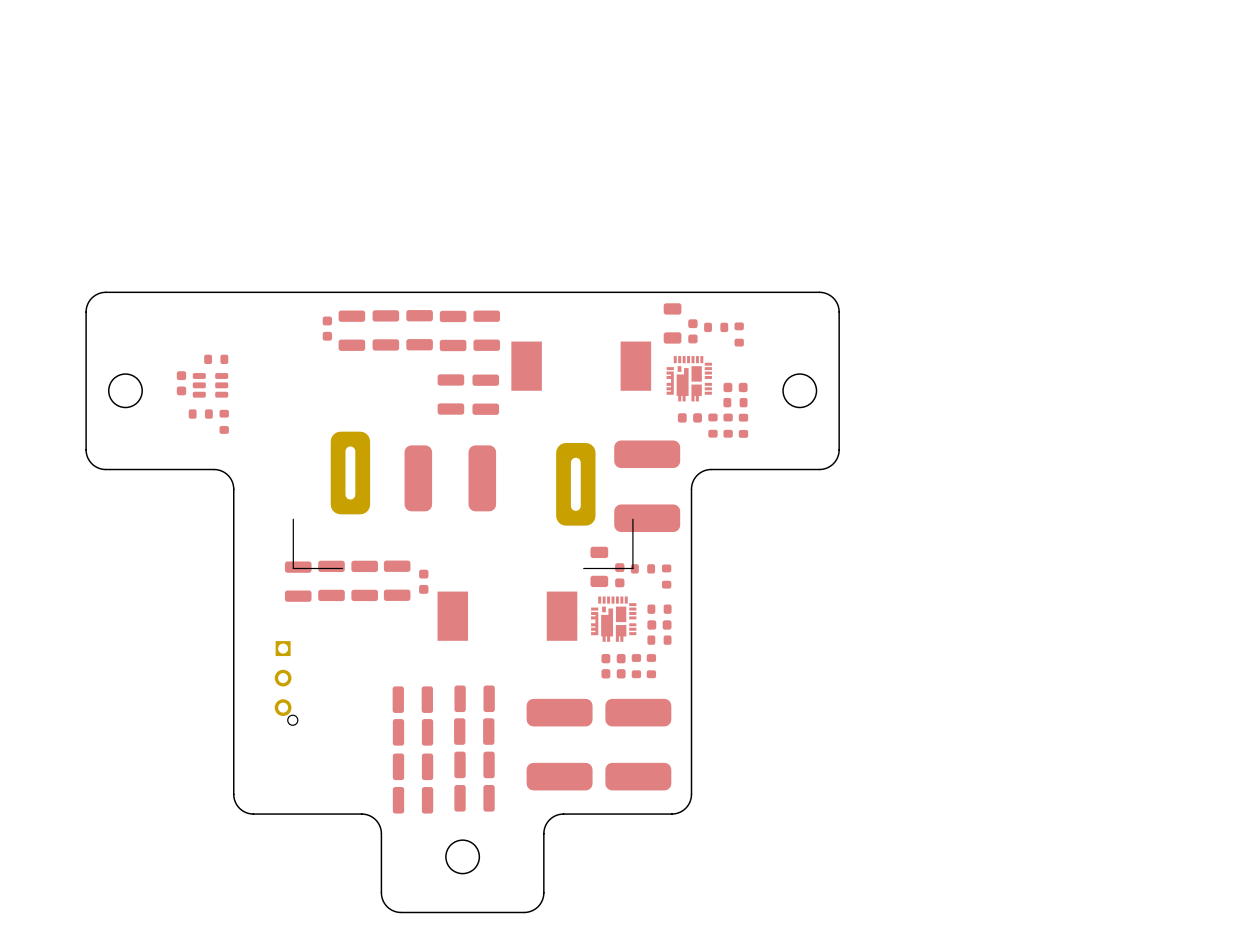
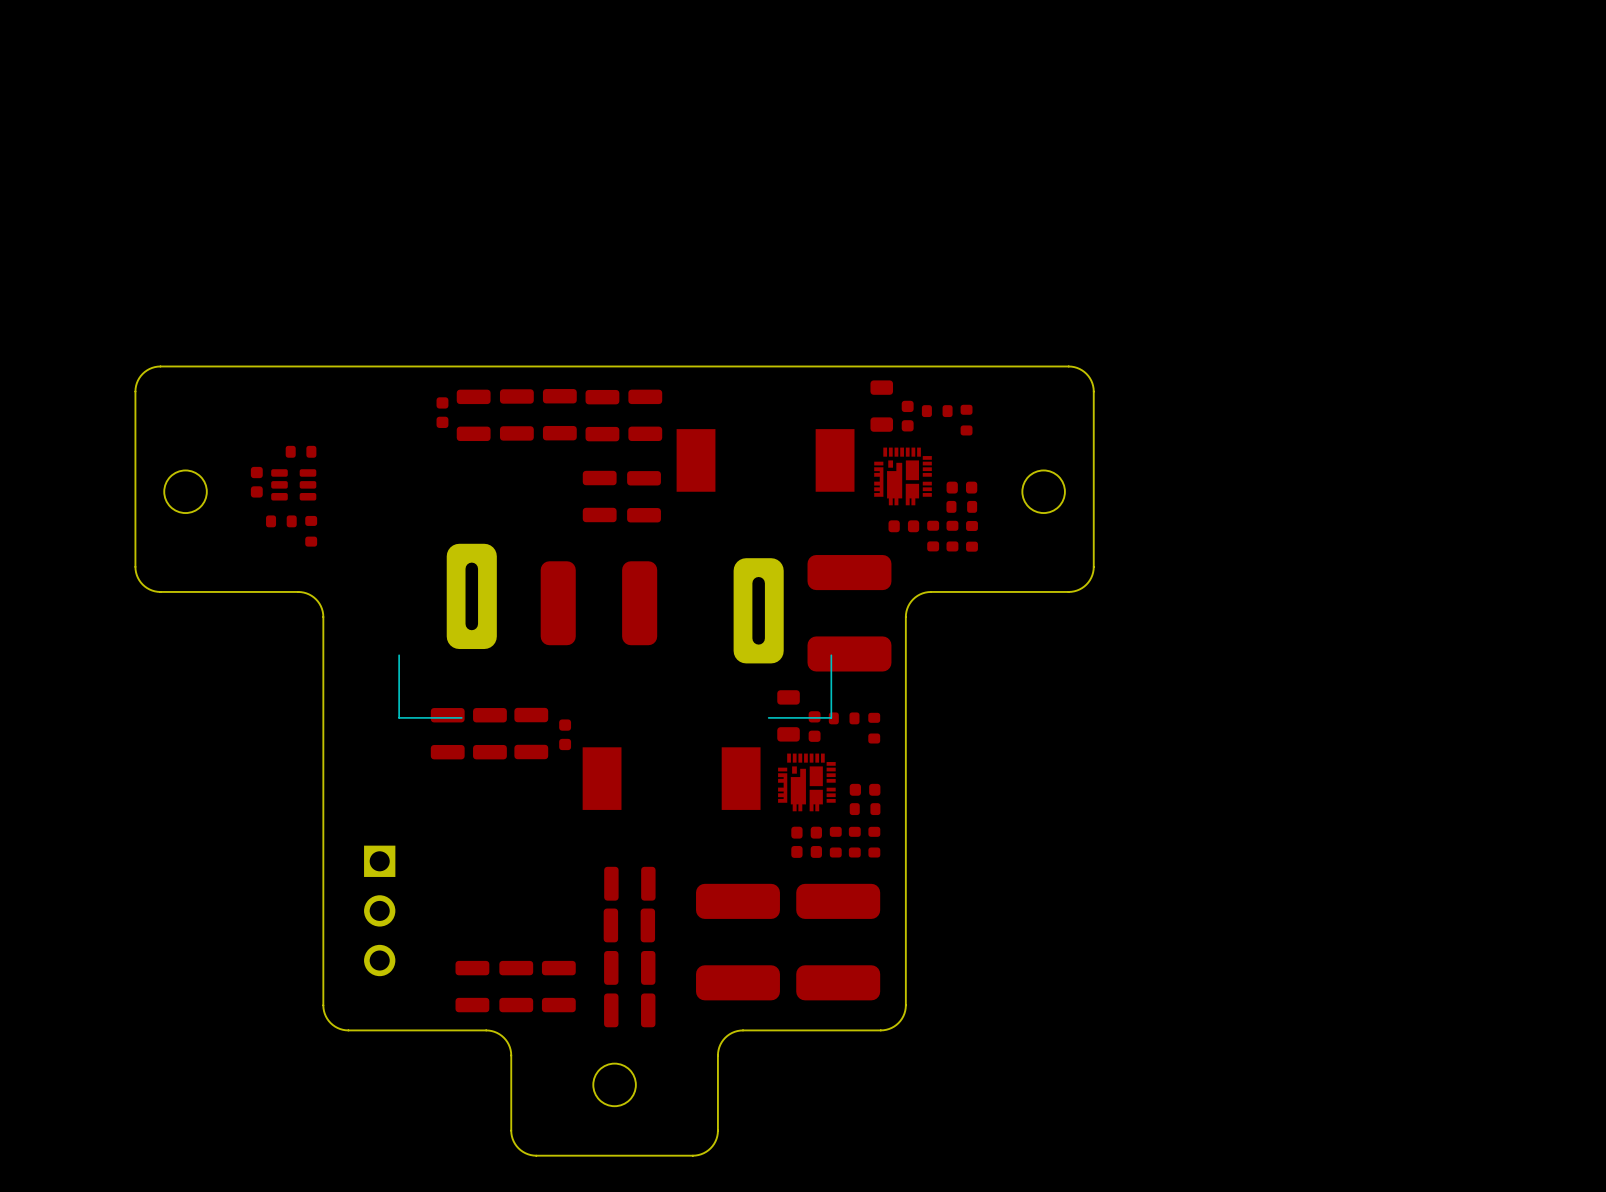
part: (298, 581) -> none
part rotation: 0° (659, 609) -> 90° clockwise (874, 842)
part position: (659, 609) -> (874, 842)
part: (286, 683) -> none
part: (412, 699) -> none
part: none -> (379, 910)
part: (413, 732) -> none
part: (413, 766) -> none
part: none -> (472, 986)
part: none -> (516, 986)
part: none -> (558, 986)
part: (413, 800) -> none

